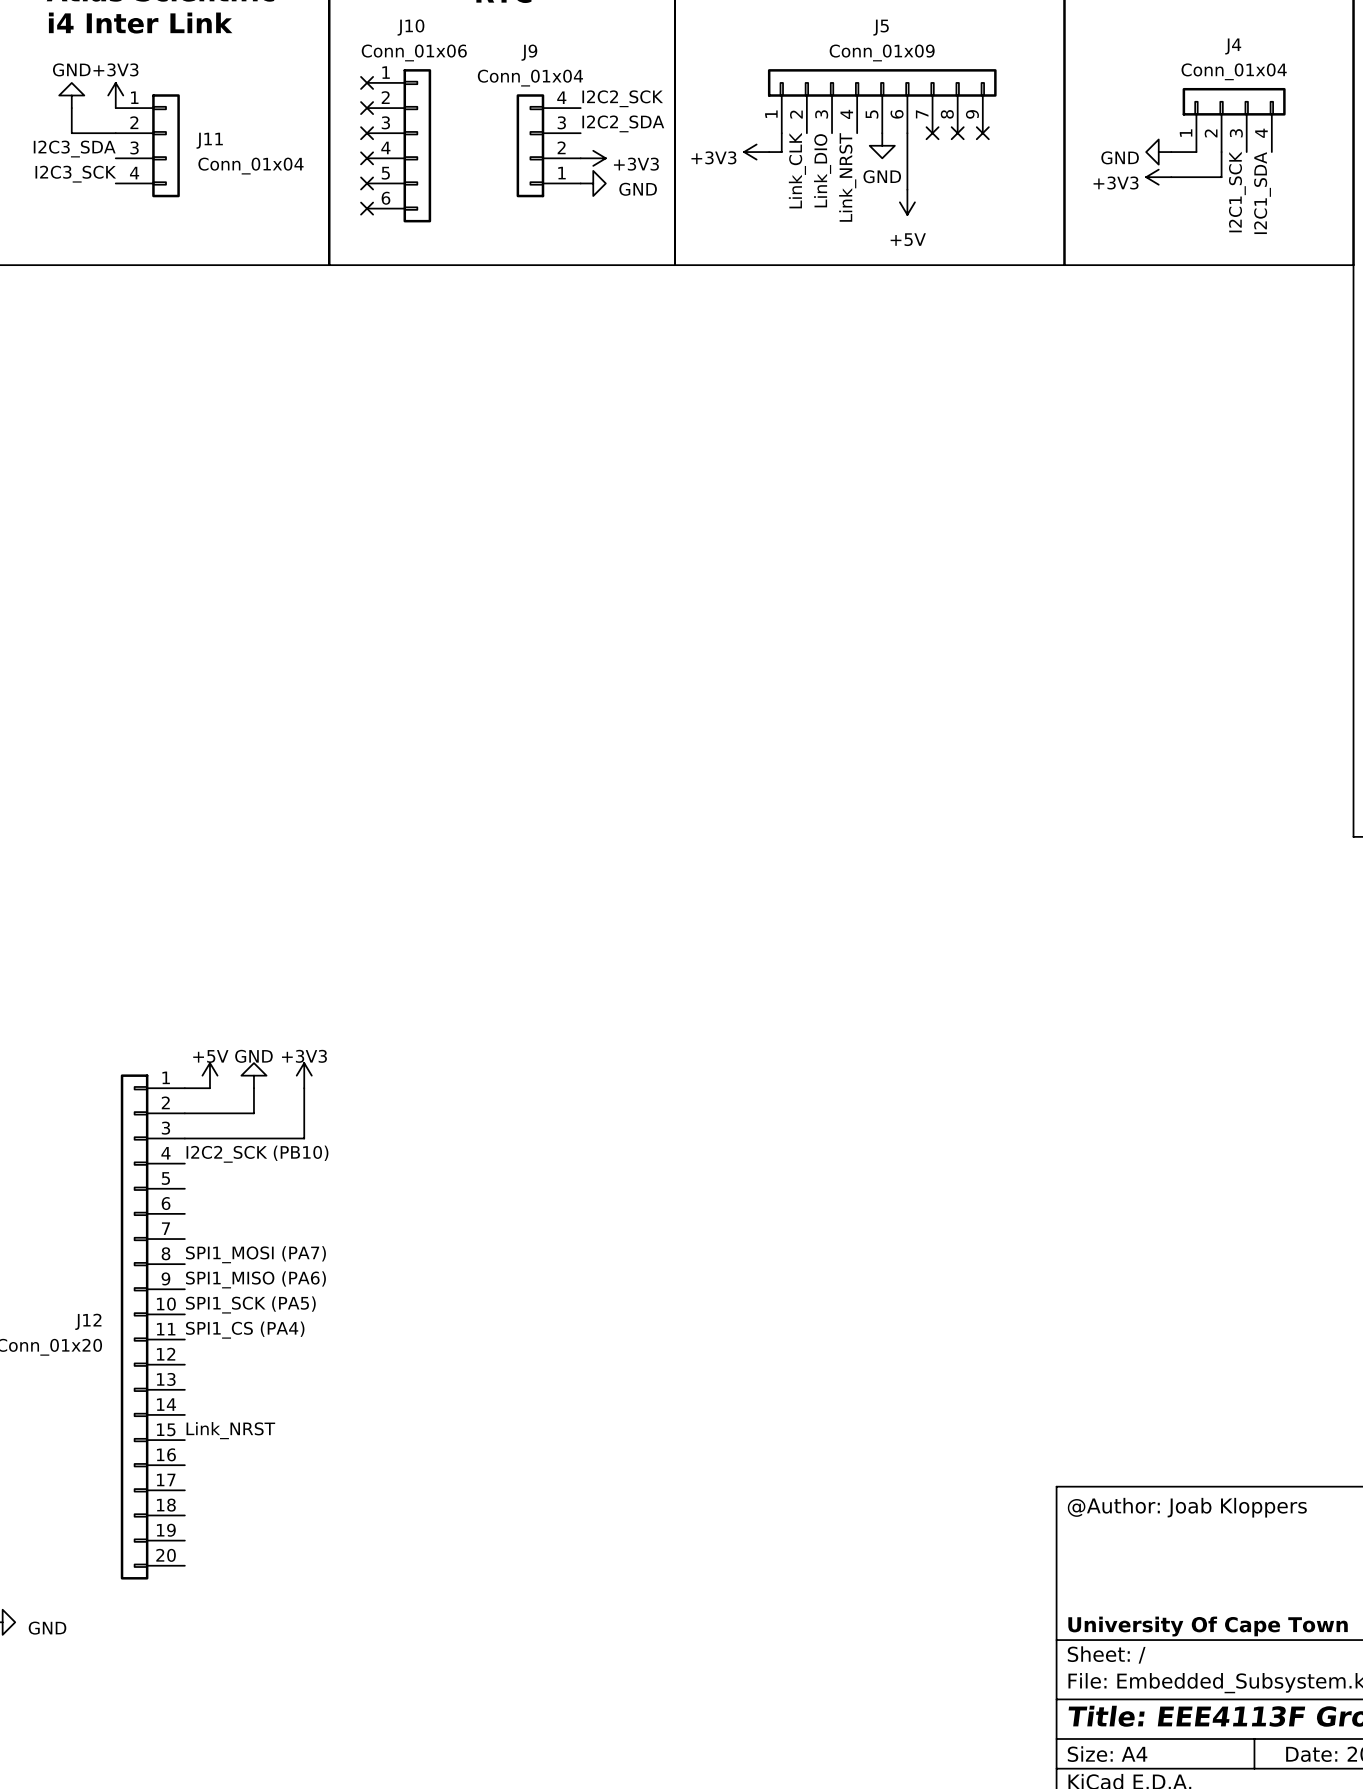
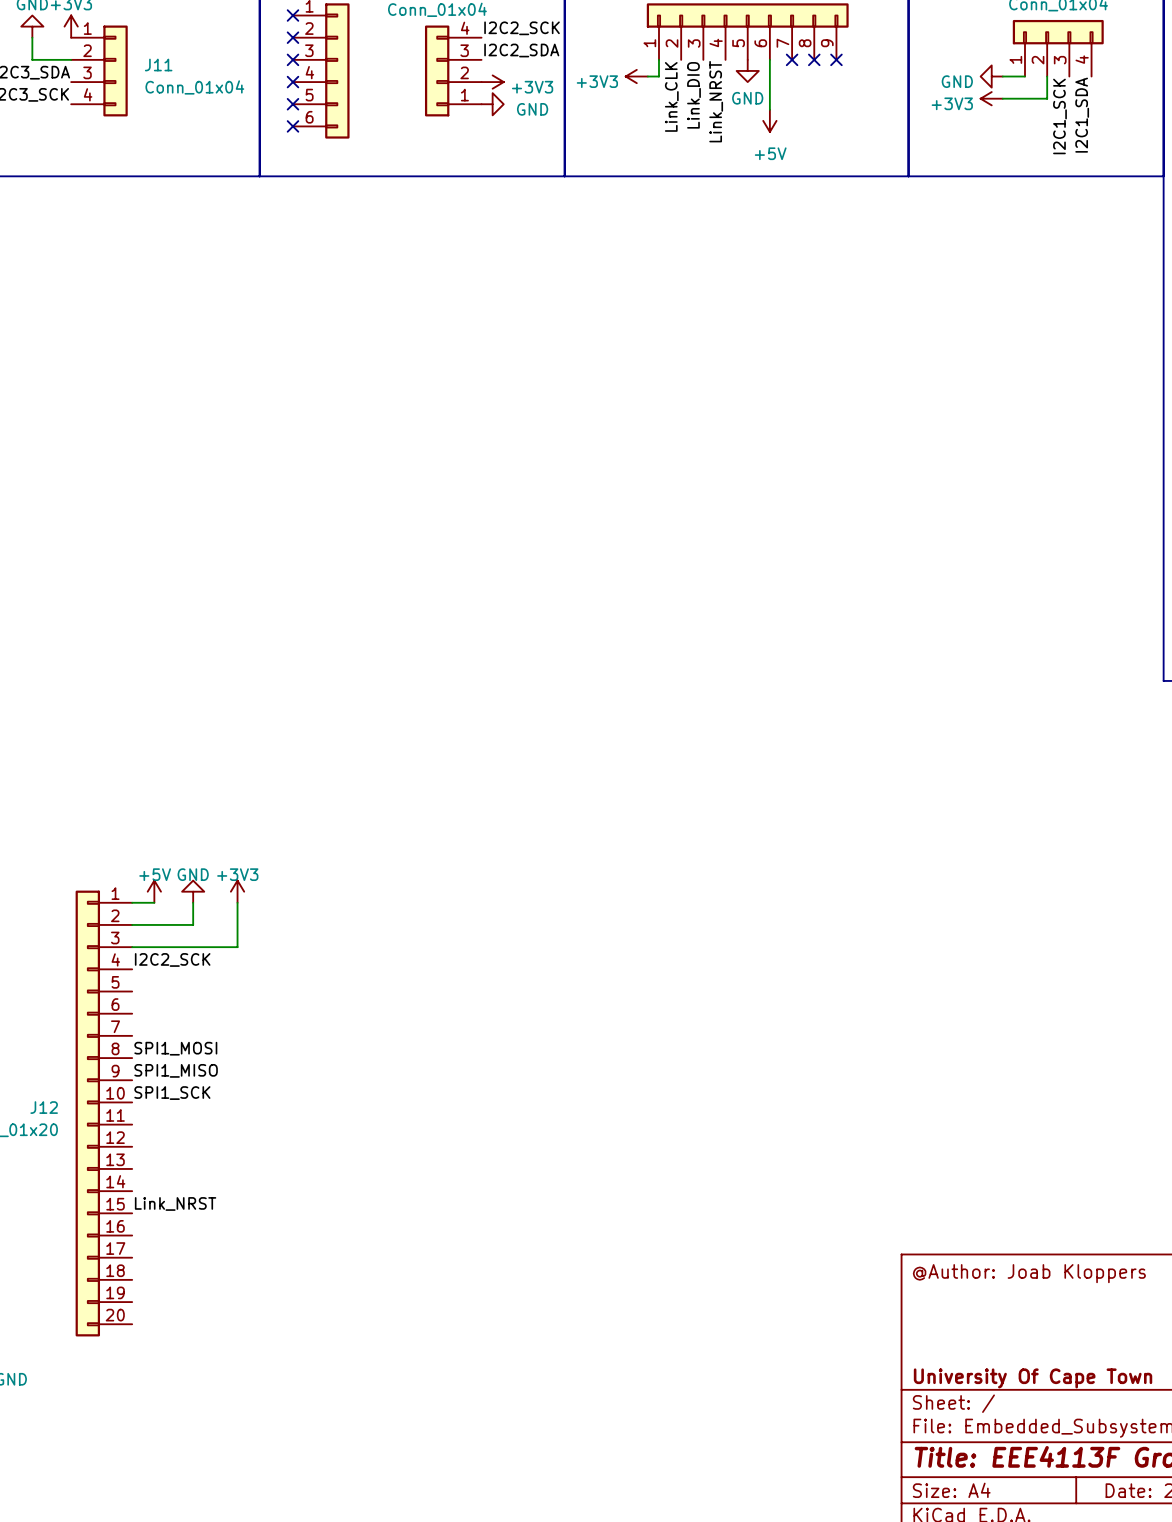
label: I2C2_SCK (PB10) (257, 1154) -> I2C2_SCK (172, 959)
label: SPI1_MOSI (PA7) (255, 1254) -> SPI1_MOSI (175, 1048)
label: SPI1_MISO (PA6) (255, 1279) -> SPI1_MISO (176, 1070)
label: SPI1_SCK (PA5) (250, 1304) -> SPI1_SCK (172, 1093)
label: SPI1_CS (PA4) (245, 1330) -> none

